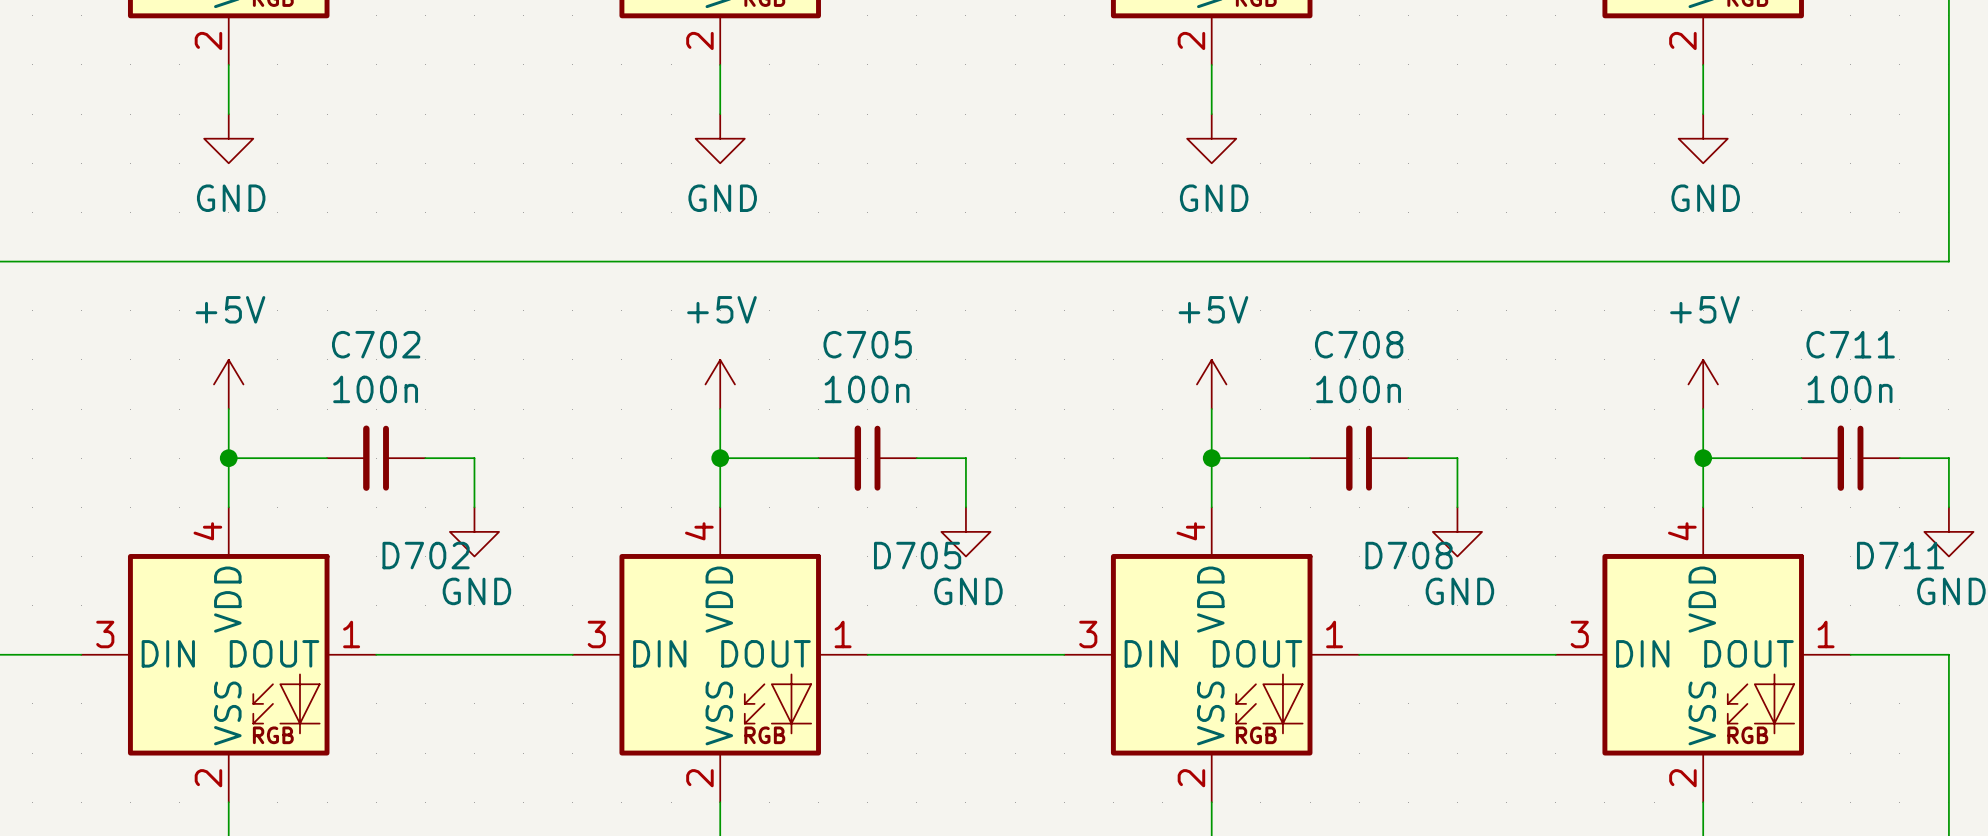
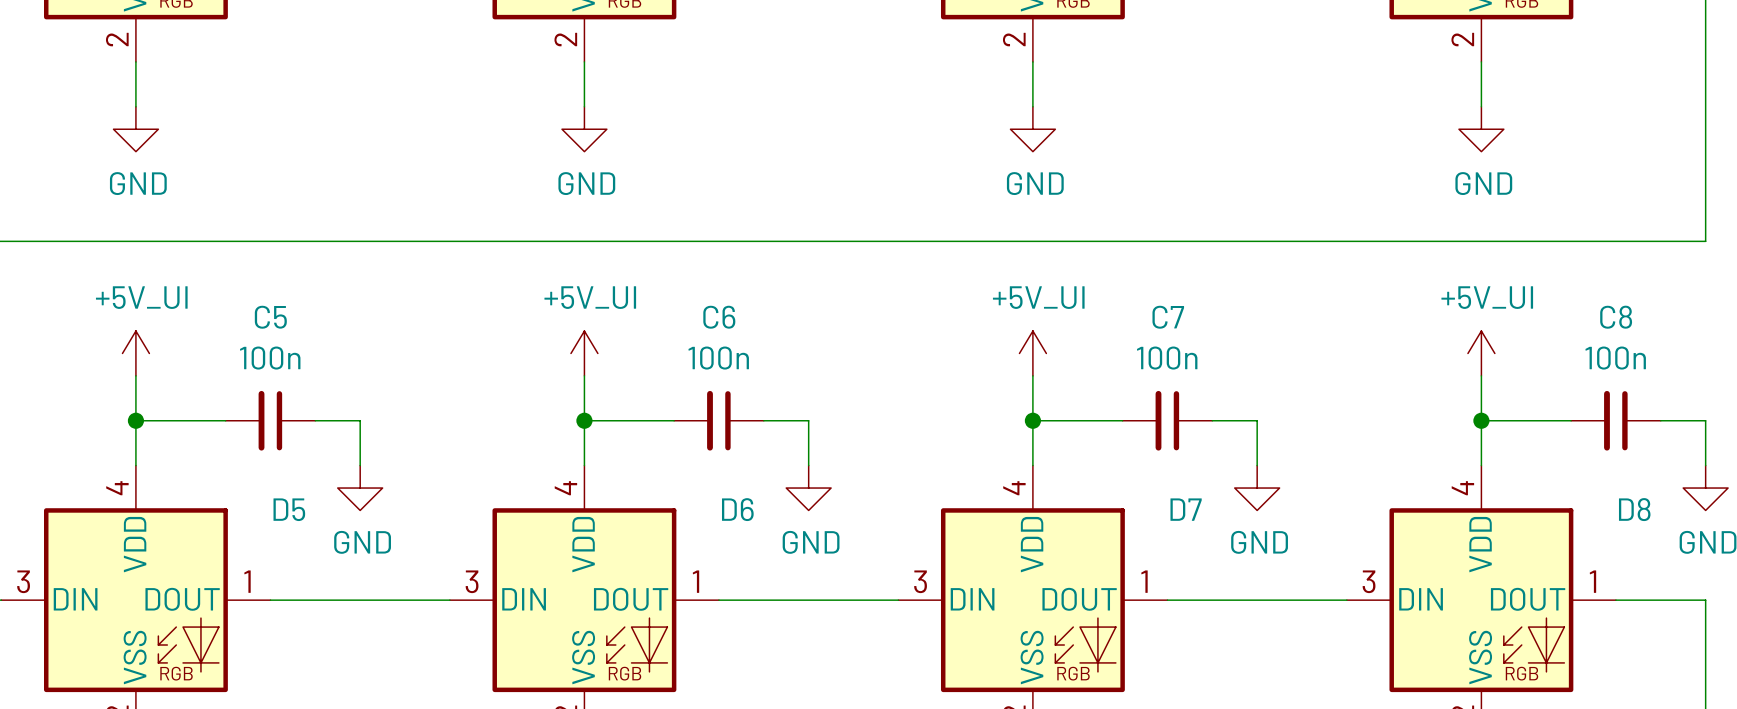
C702 name: C702 (376, 344) -> C5 (270, 317)
C705 name: C705 (867, 344) -> C6 (719, 317)
C708 name: C708 (1359, 344) -> C7 (1168, 317)
C711 name: C711 (1850, 344) -> C8 (1616, 317)
power symbol: +5V (228, 384) -> +5V_UI (135, 353)
power symbol: +5V (720, 384) -> +5V_UI (584, 353)
power symbol: +5V (1211, 384) -> +5V_UI (1032, 353)
power symbol: +5V (1703, 384) -> +5V_UI (1481, 353)
D702 name: D702 (426, 555) -> D5 (289, 509)
D705 name: D705 (917, 555) -> D6 (737, 509)
D708 name: D708 (1409, 555) -> D7 (1186, 509)
D711 name: D711 (1900, 555) -> D8 (1634, 509)

